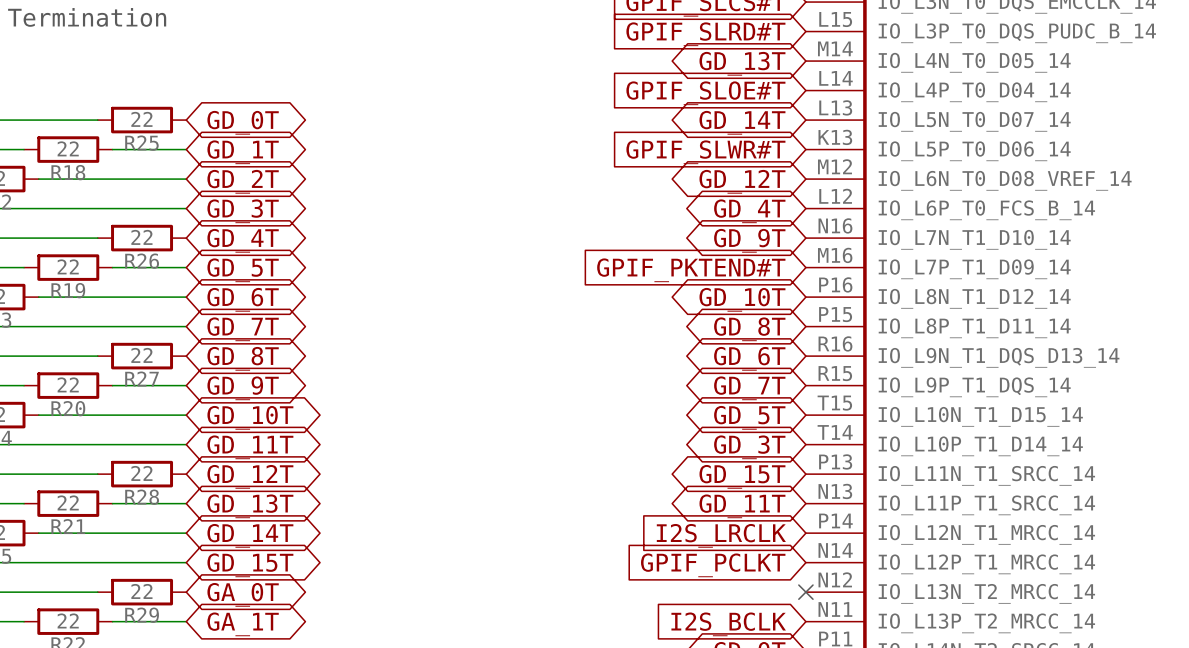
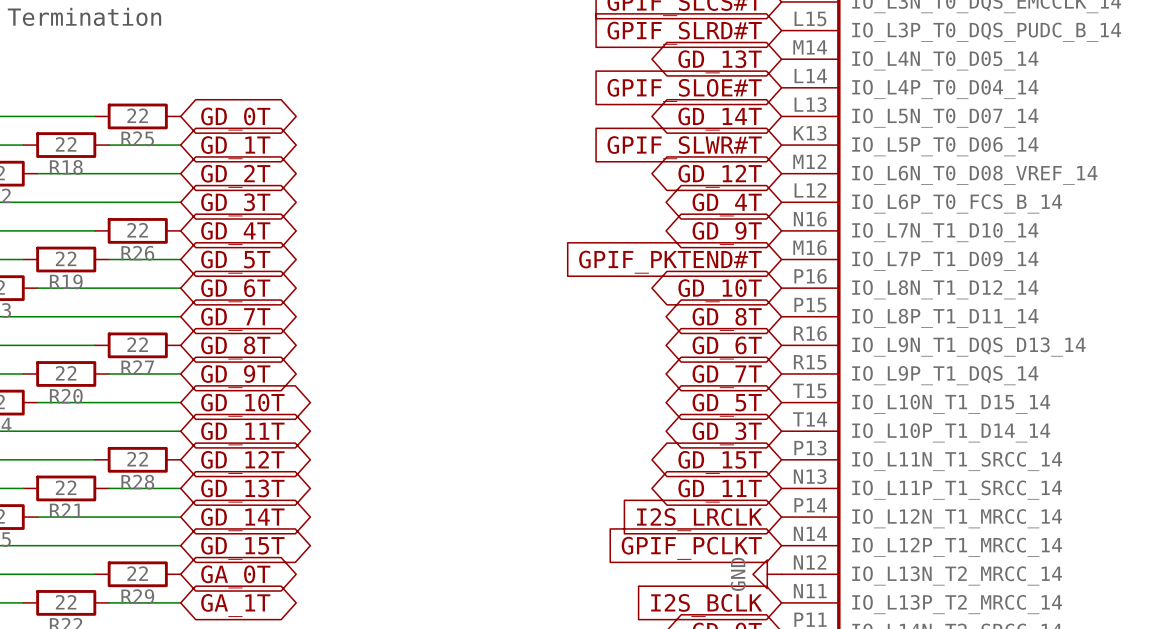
power symbol: none -> GND (767, 574)
no-connect mark: (805, 592) -> none

